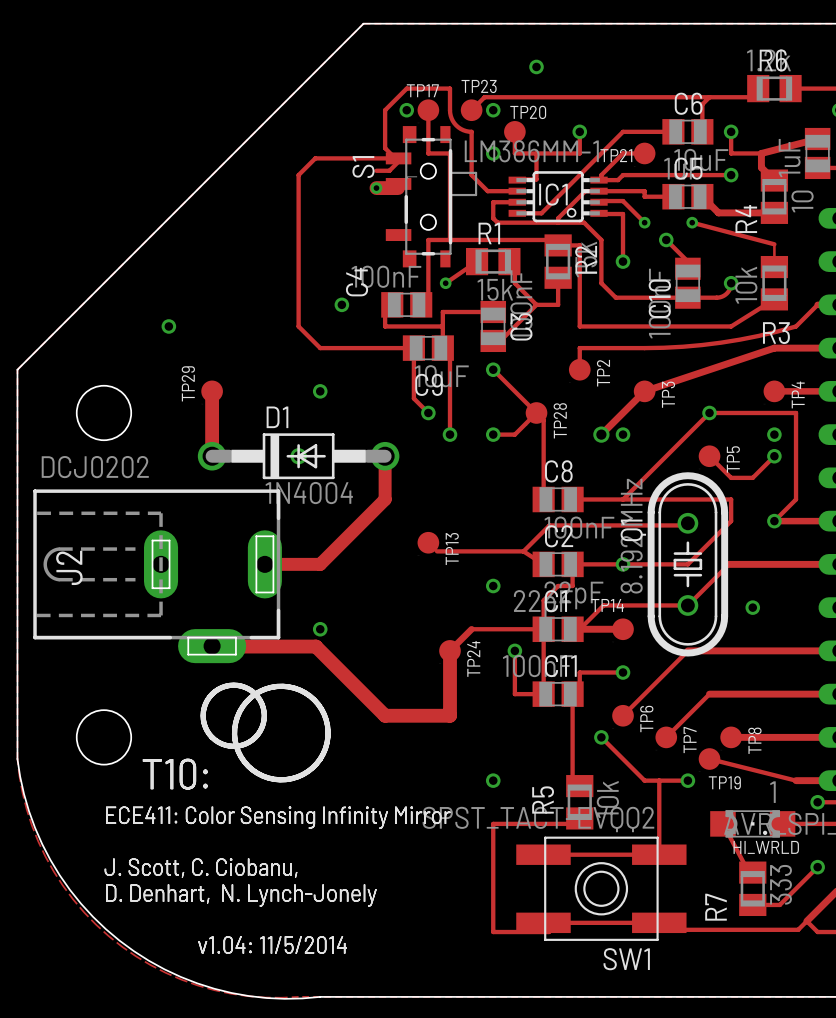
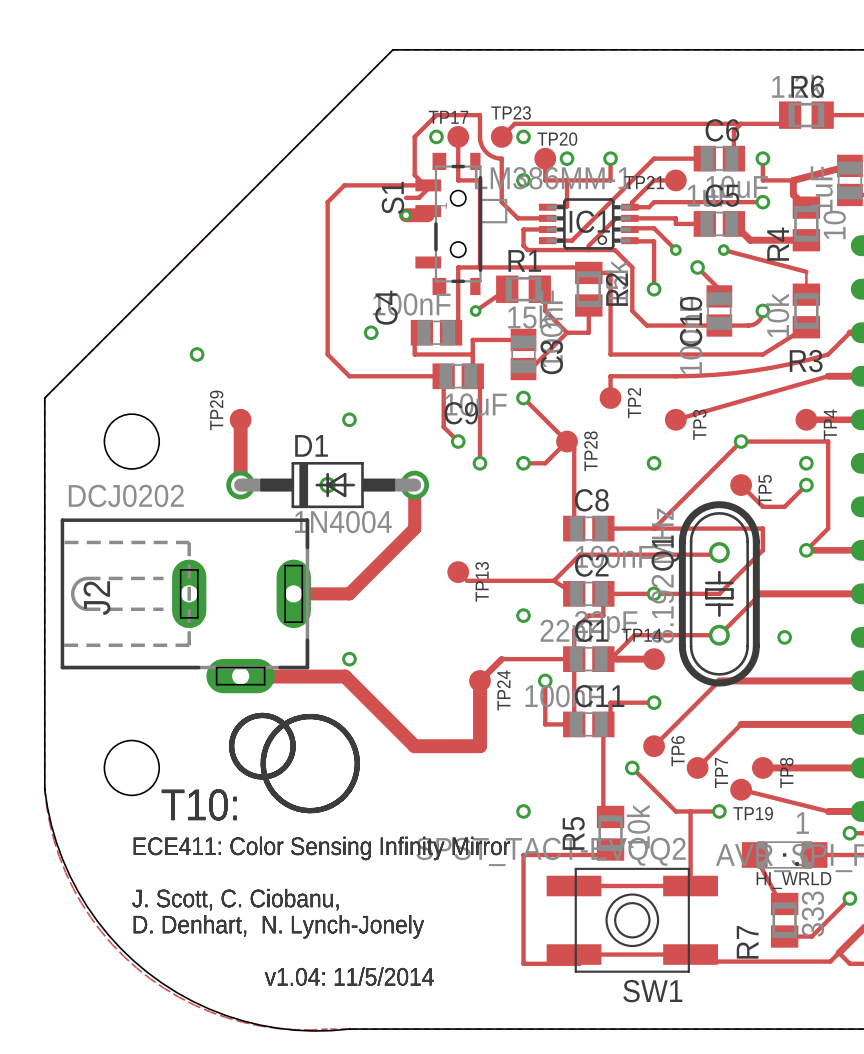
via position: (536, 66) -> (567, 158)
track: (796, 348) (774, 348) (644, 391) (601, 434) -> (828, 376) (675, 419)
via: (601, 434) -> none

